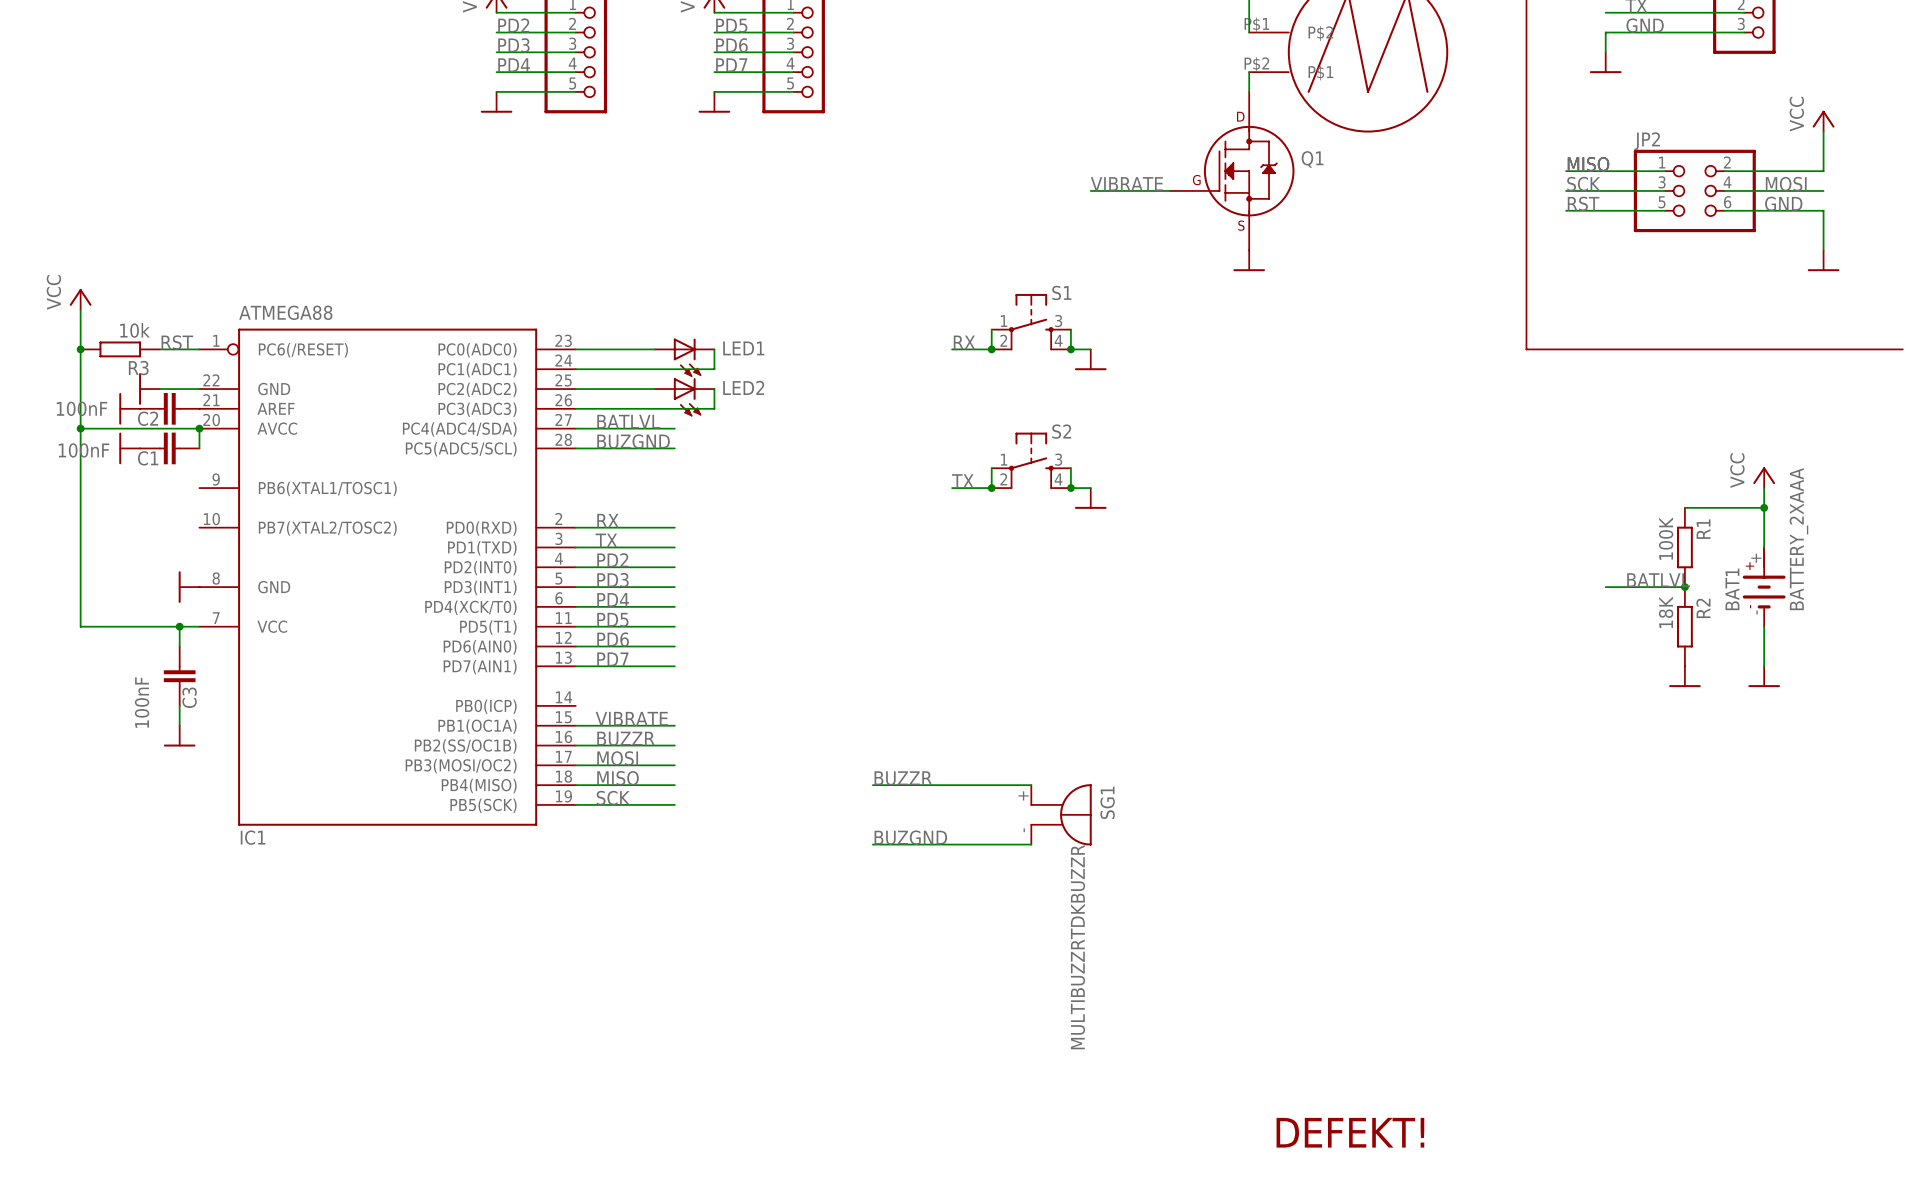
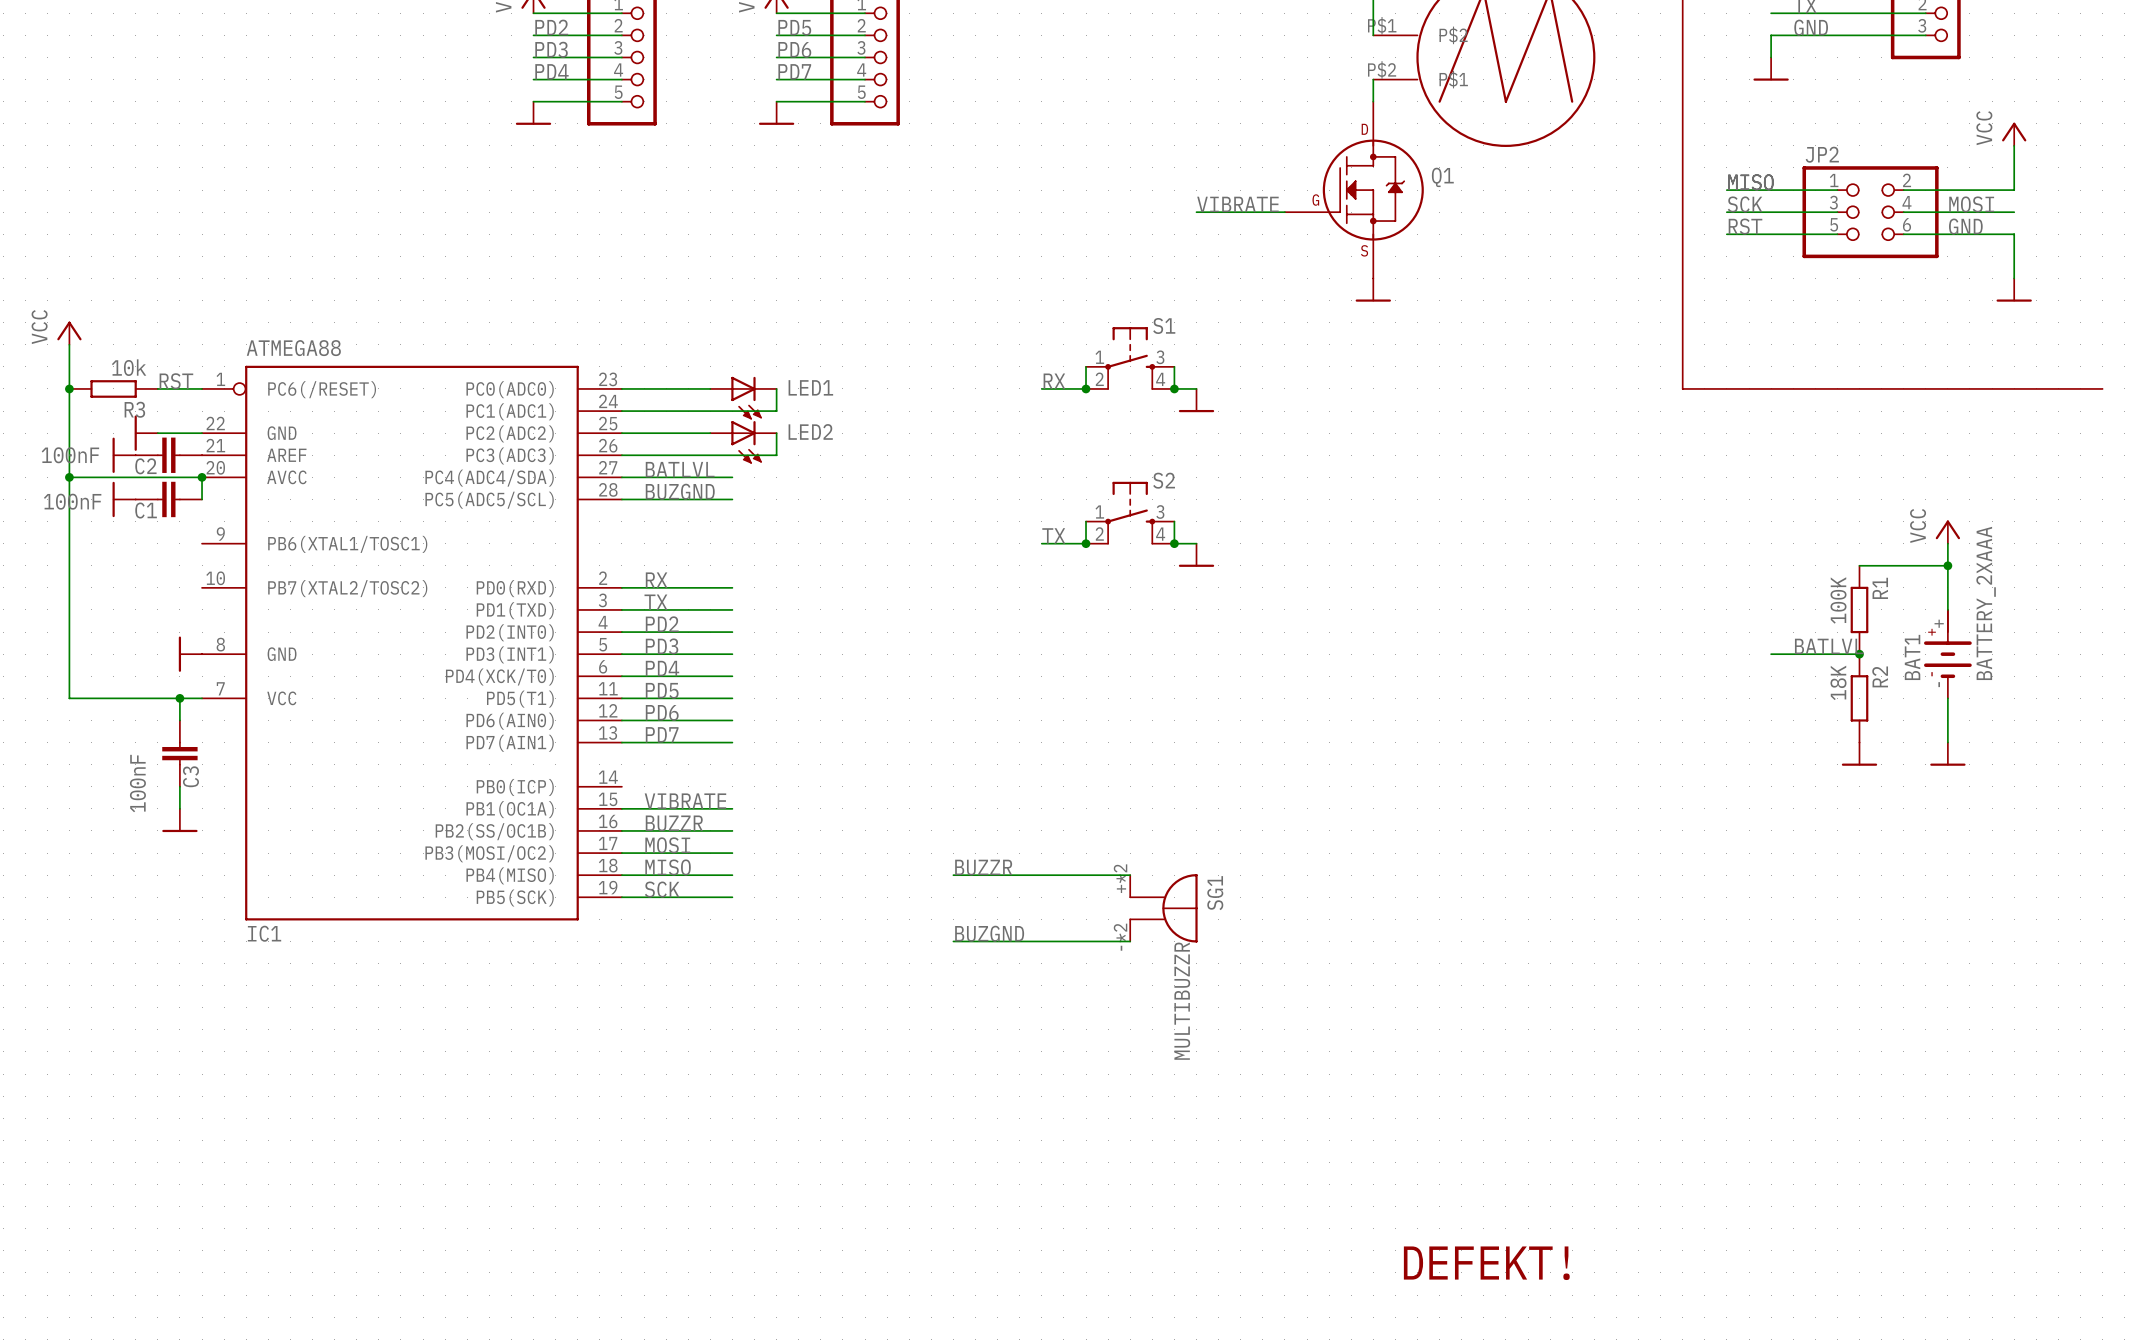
SG1 pin number: + (1023, 795) -> +*2 (1120, 878)
SG1 pin number: - (1024, 830) -> -*2 (1120, 937)
SG1 value: MULTIBUZZRTDKBUZZR (1078, 947) -> MULTIBUZZR (1182, 1001)

